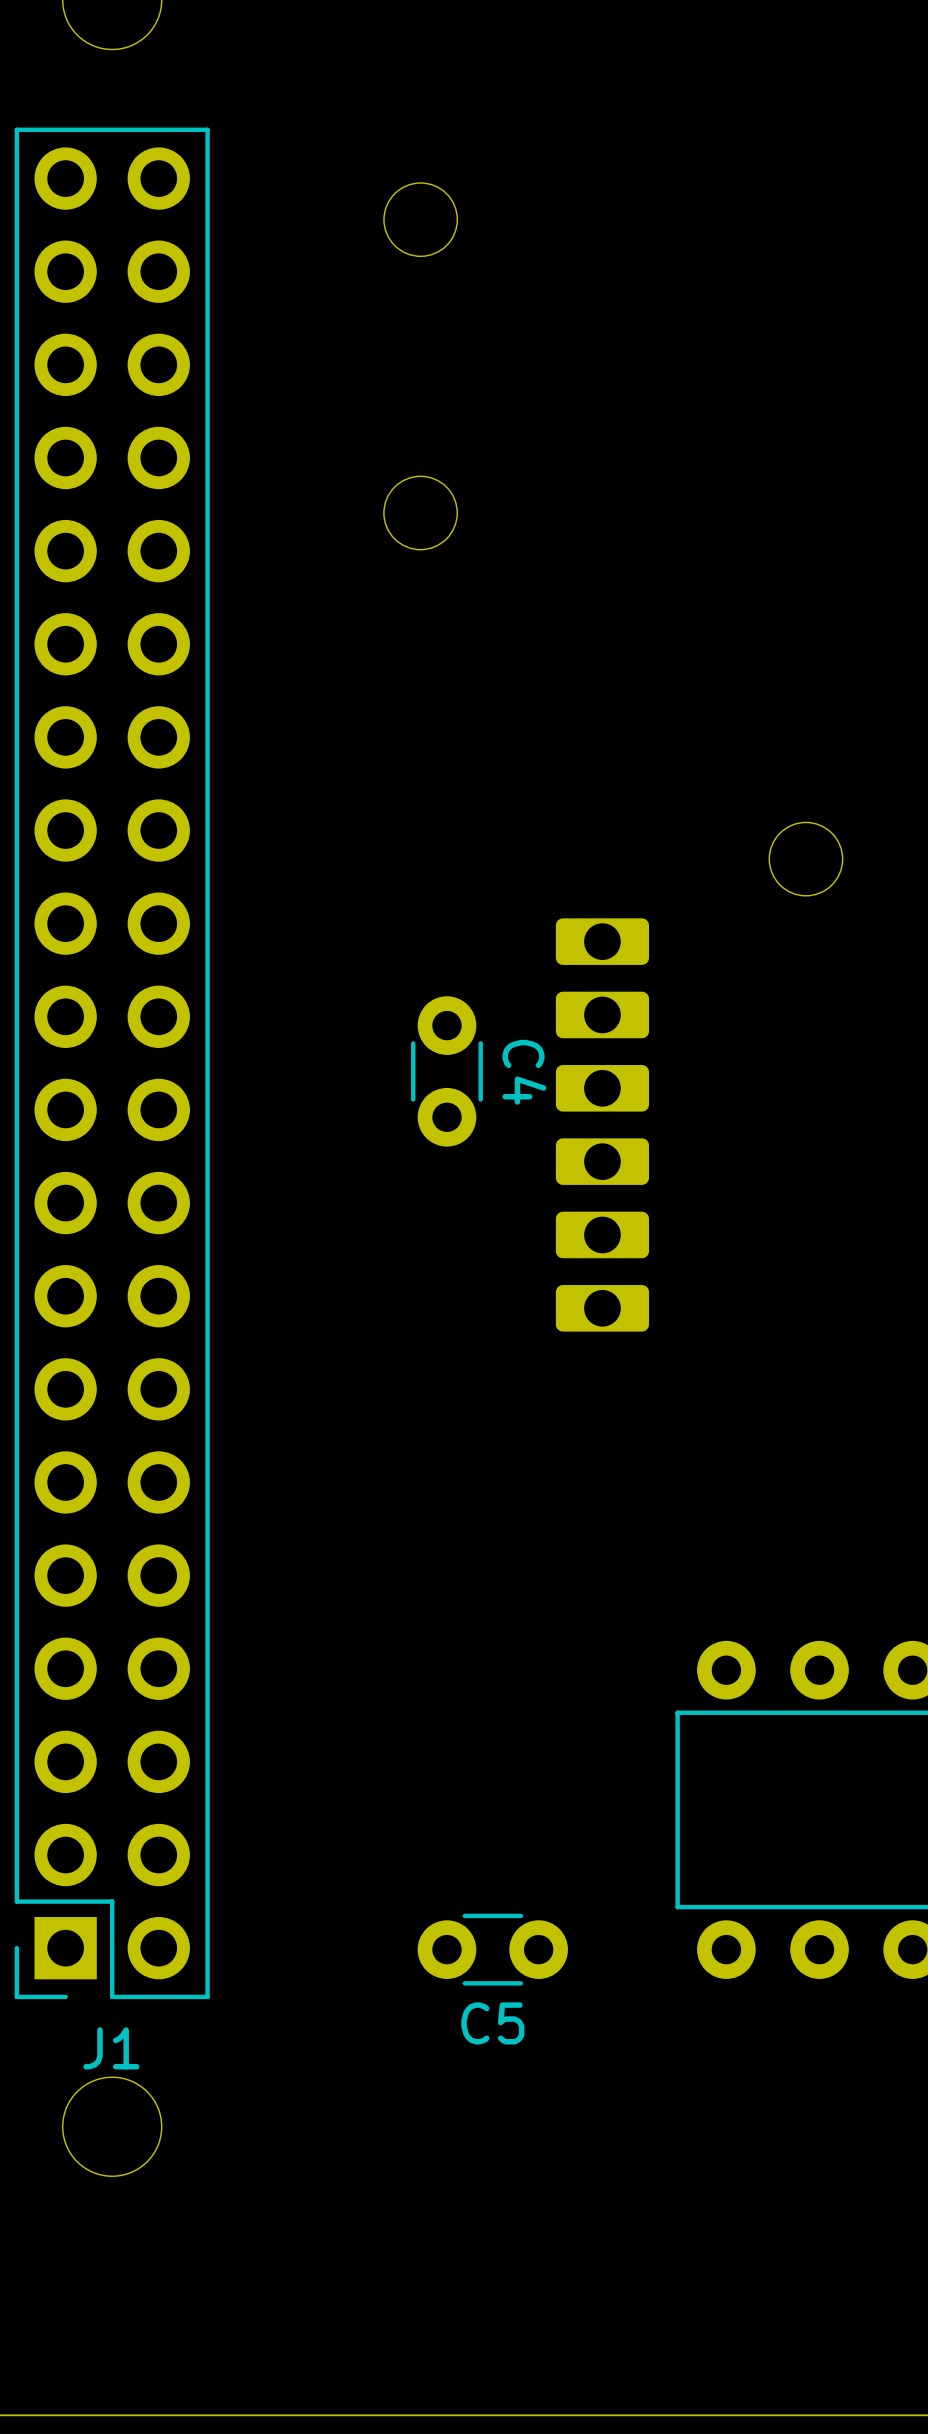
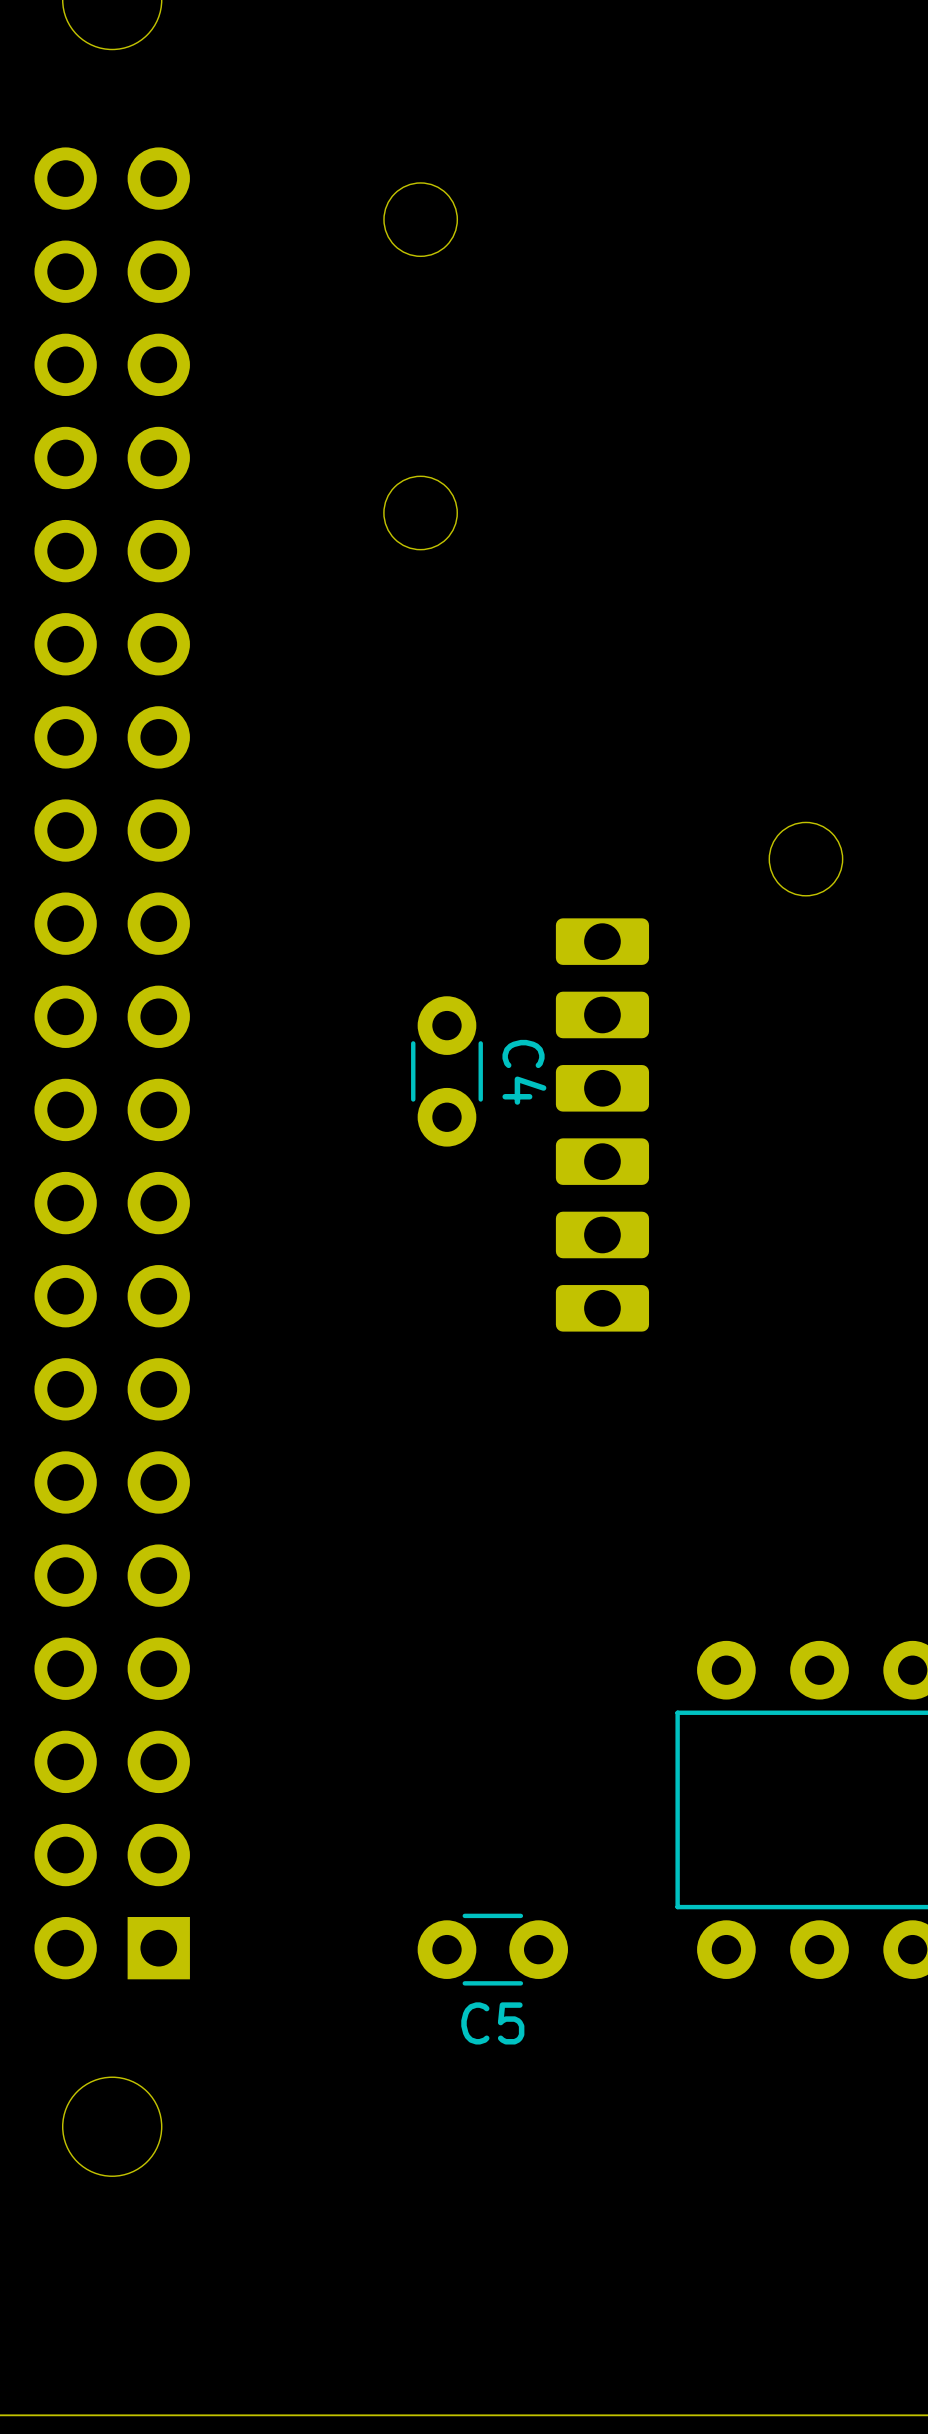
J1 side: bottom (112, 1063) -> top (112, 1063)

